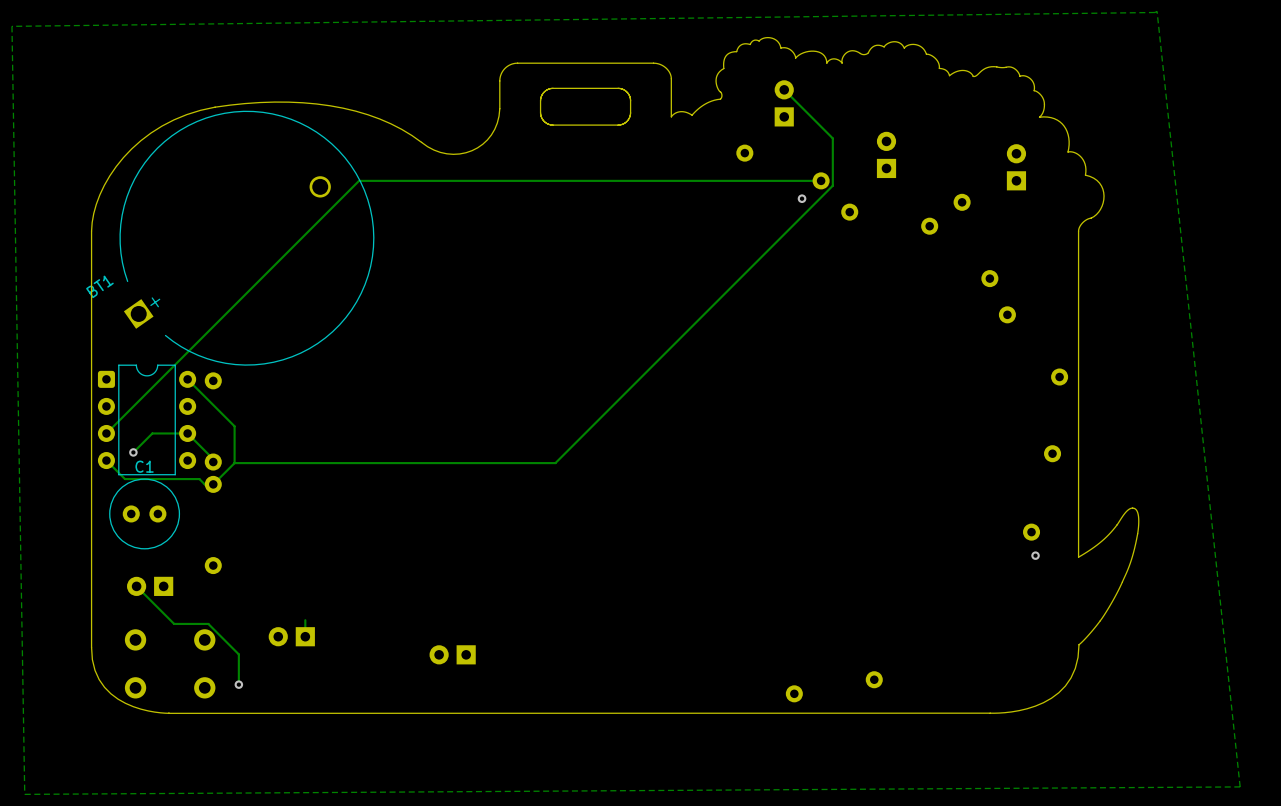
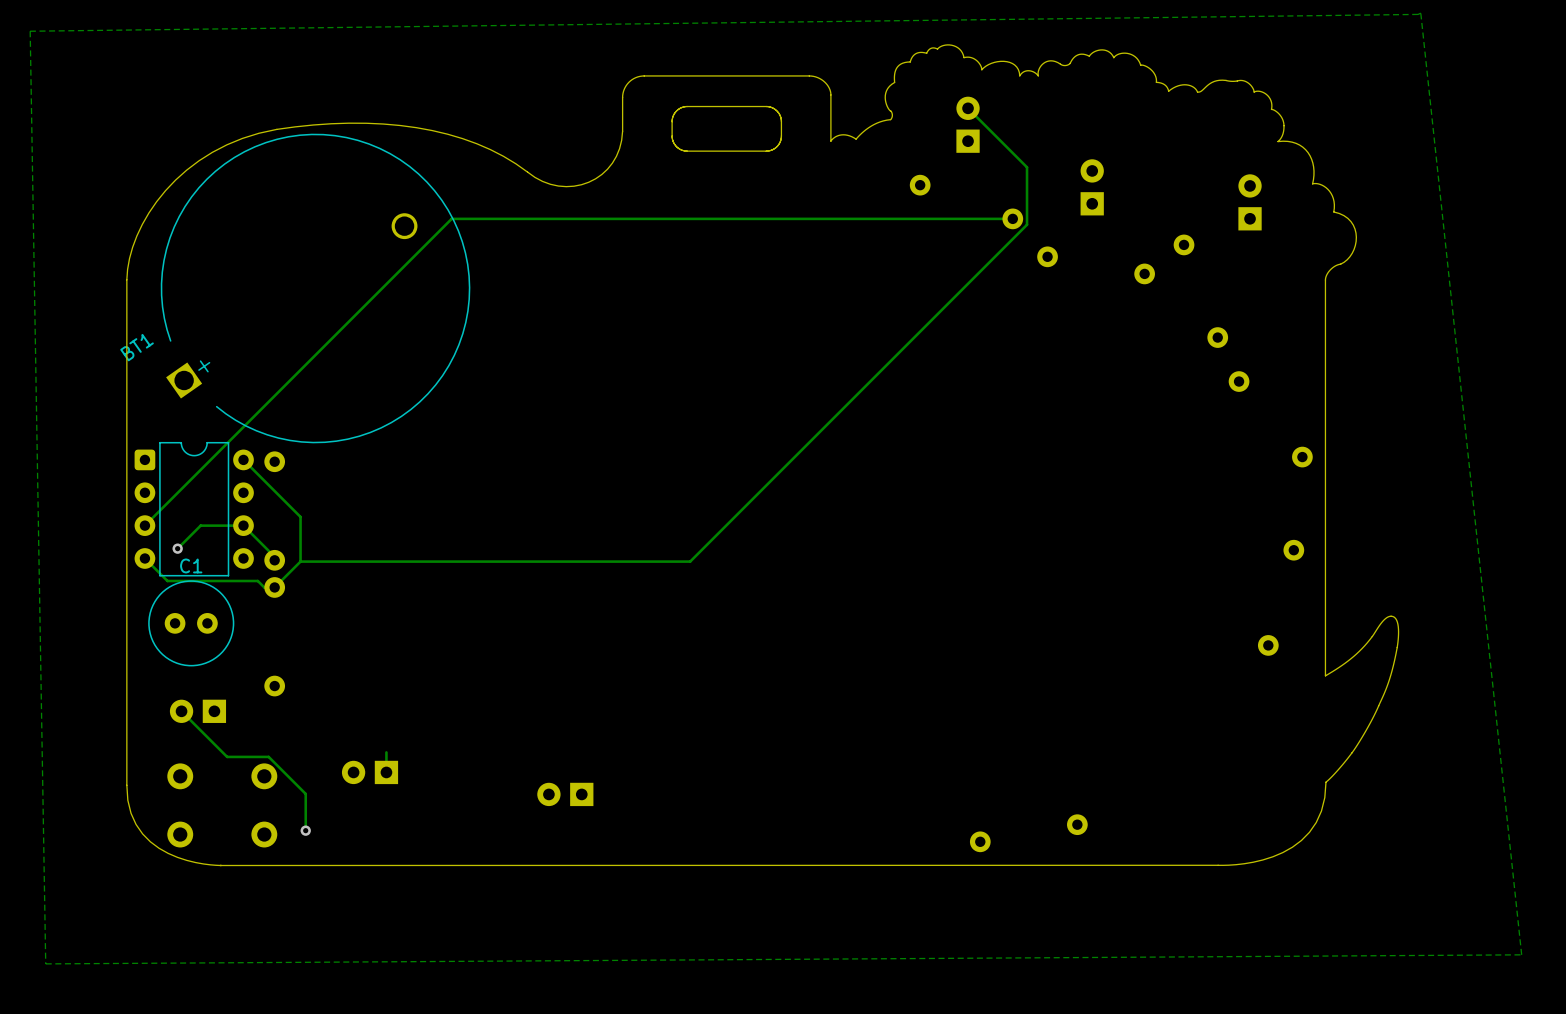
via: (802, 198) -> none
via: (1035, 555) -> none

